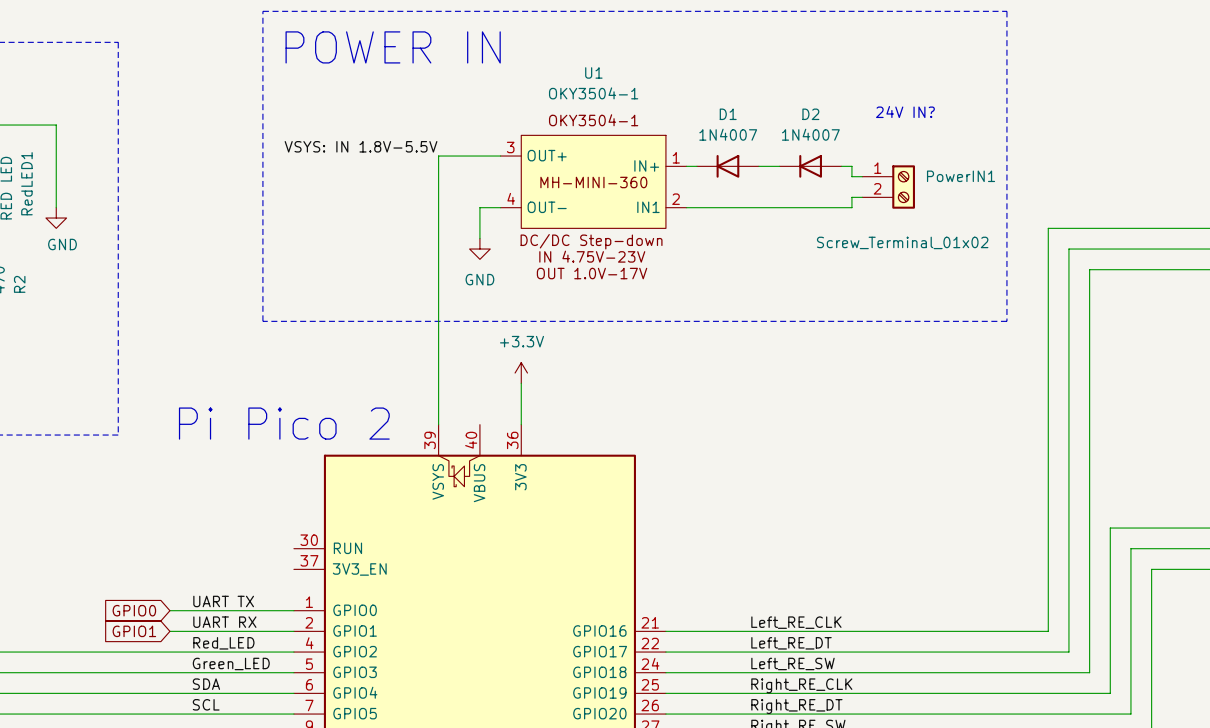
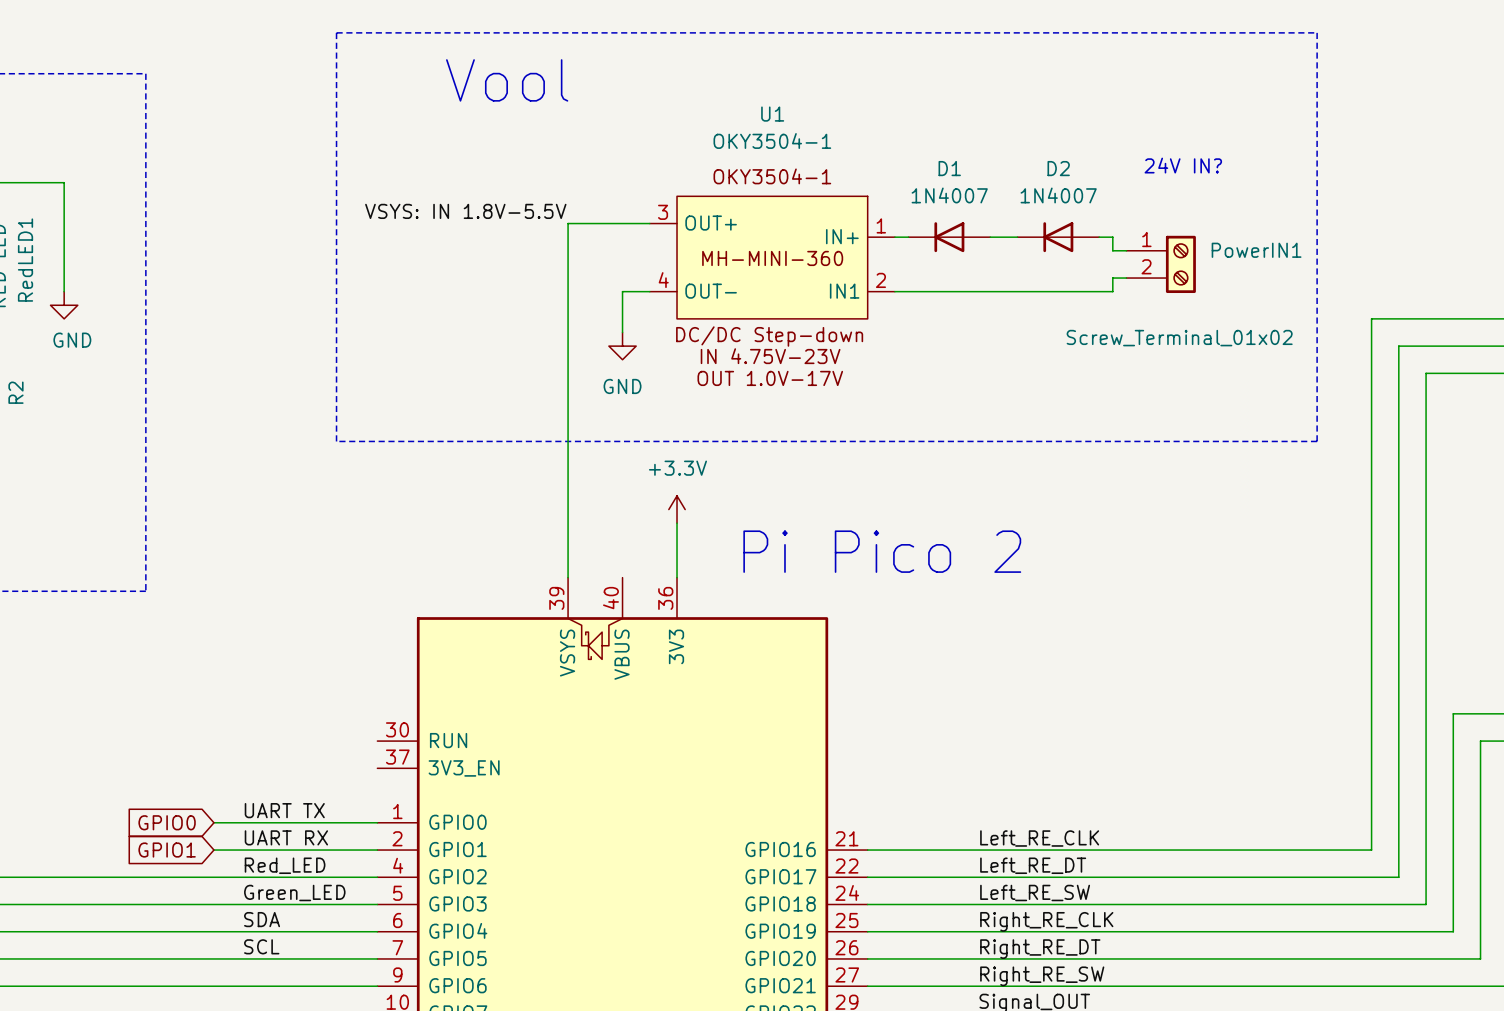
text: POWER IN (393, 47) -> Vool (507, 80)
text: none -> Pi Pico 2 (882, 551)
text: Pi Pico 2 (284, 423) -> none

